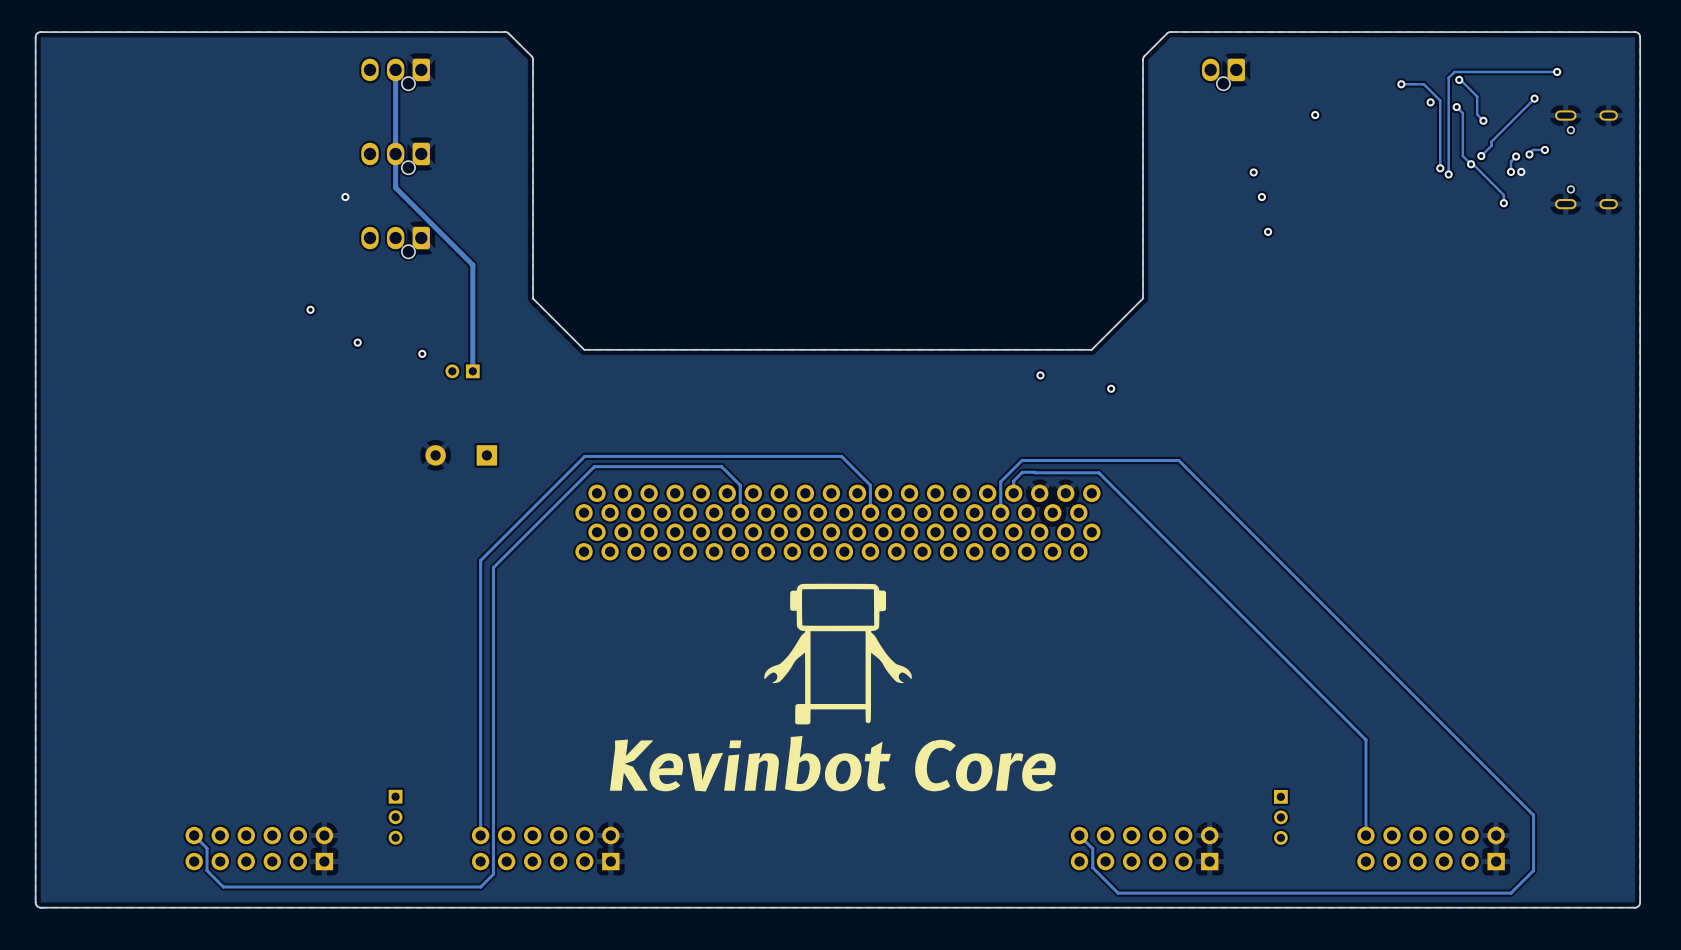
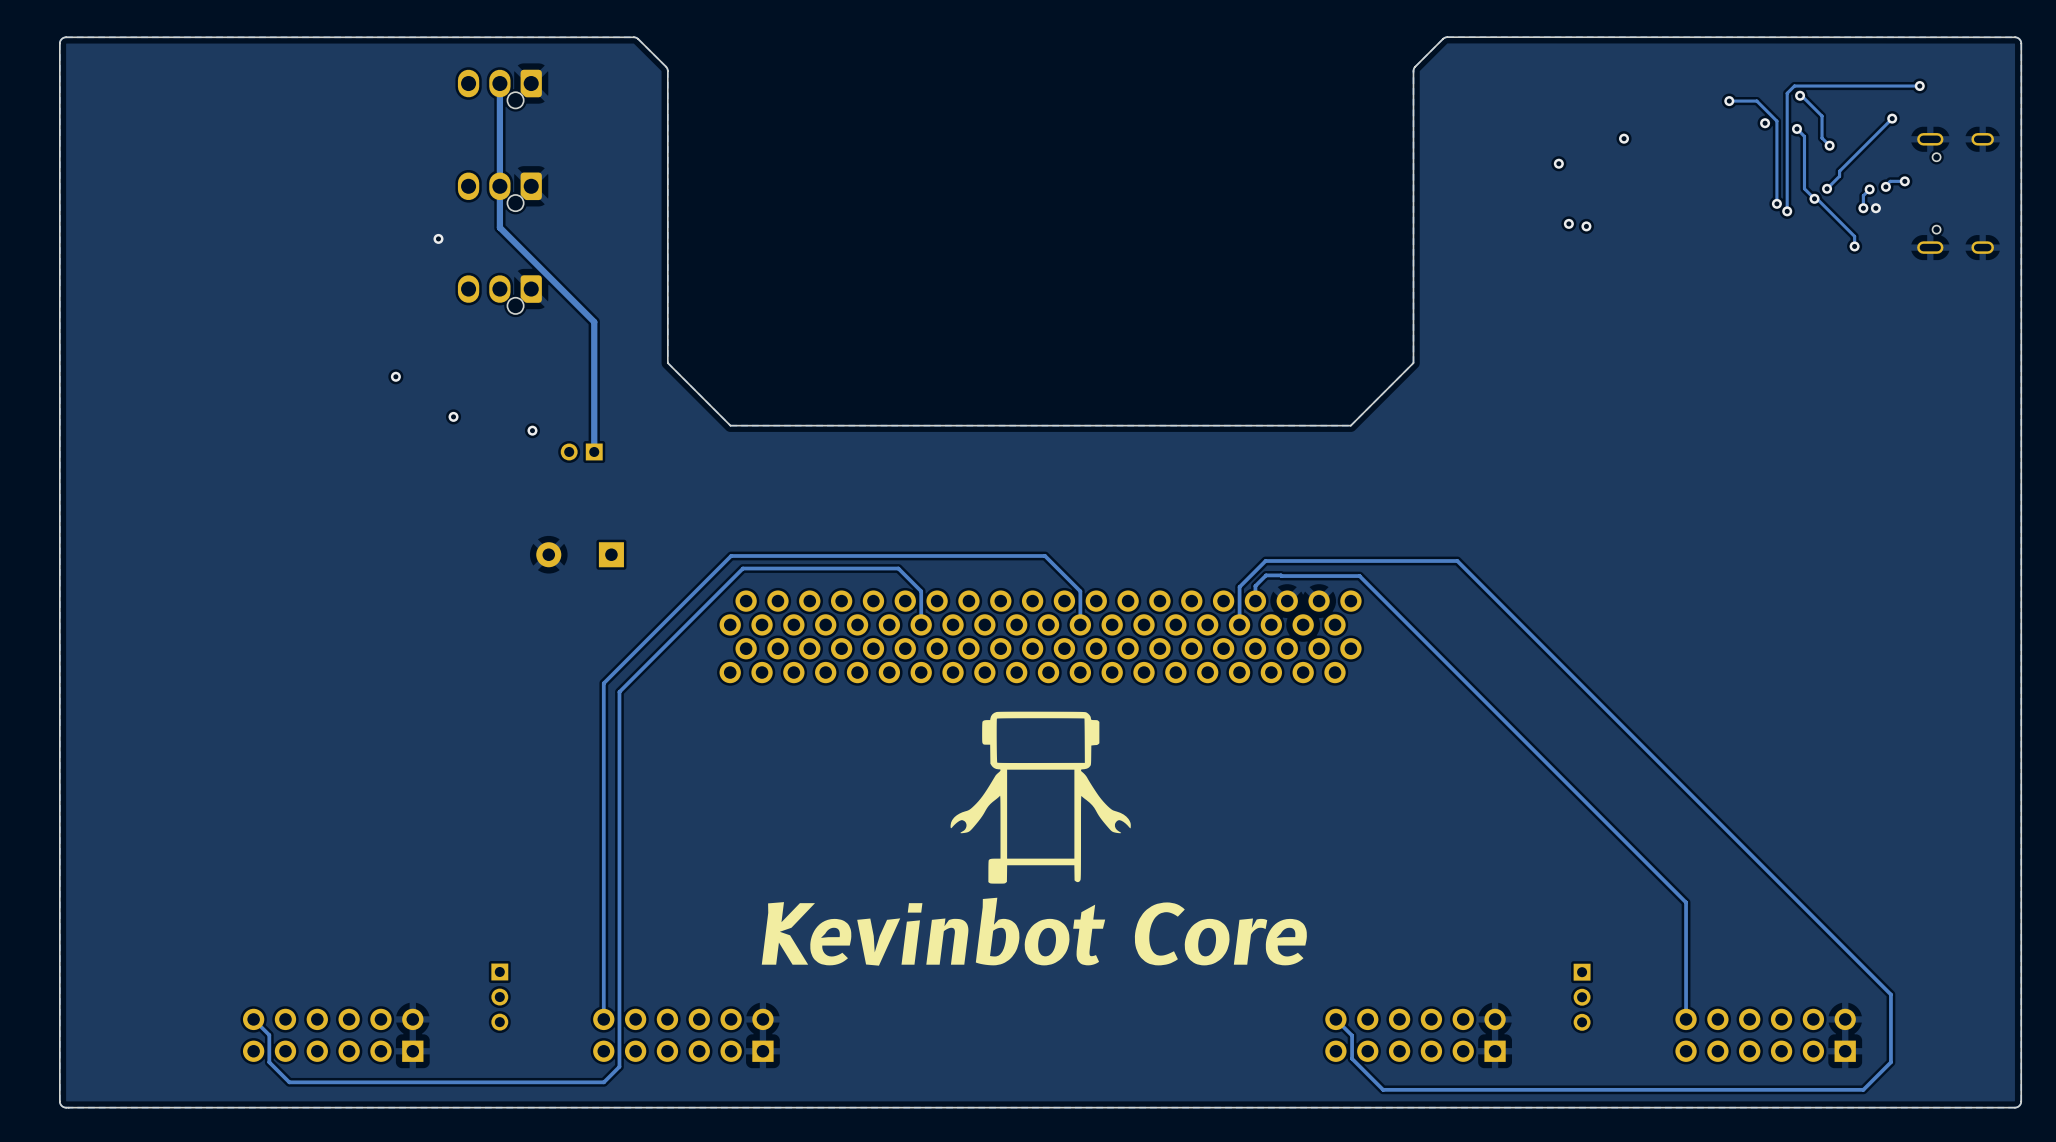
part: (1223, 74) -> none
via: none -> (1558, 163)
via: (1253, 172) -> none
via: none -> (1568, 223)
via: none -> (1586, 226)
via: (1261, 197) -> none
via: (1268, 231) -> none
via: (1040, 375) -> none
via: (1111, 388) -> none

